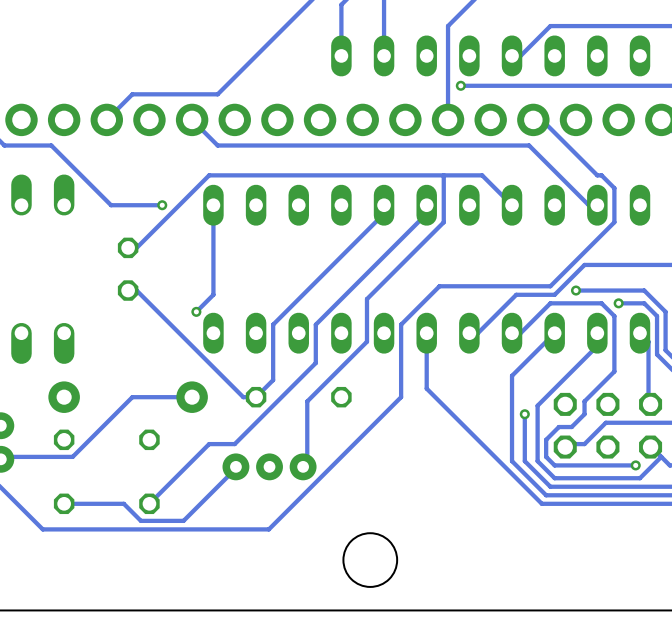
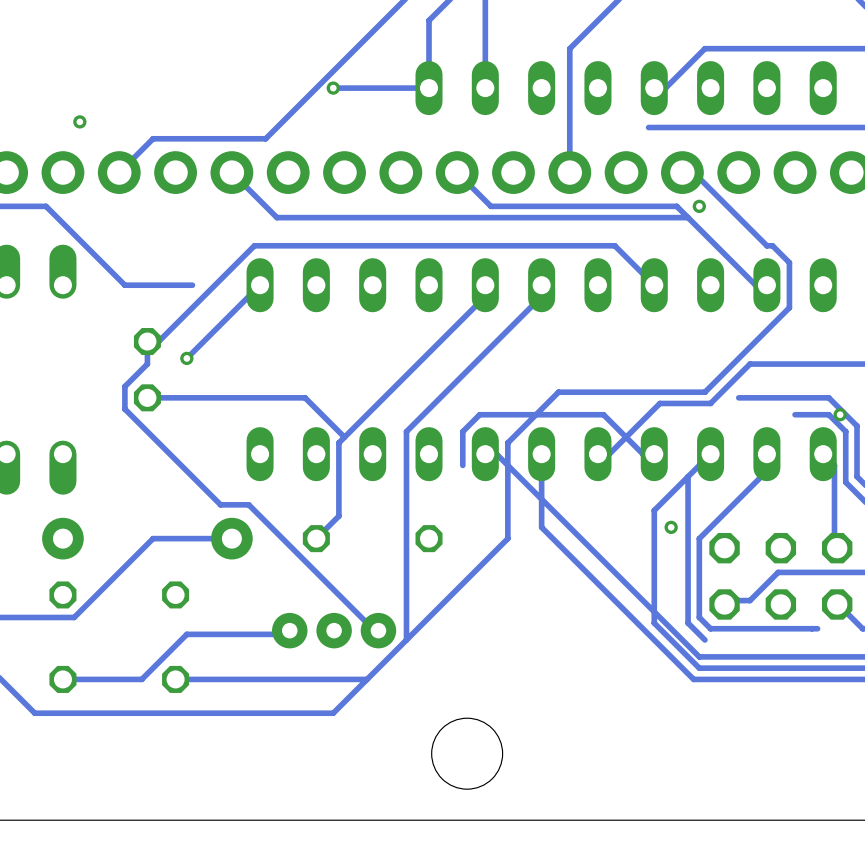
via: none -> (333, 88)
track: none -> (429, 88) (333, 88)
via: none -> (79, 121)
via: (460, 85) -> none
track: (507, 85) (460, 85) -> none
track: none -> (265, 206) (276, 217) (688, 217)
track: (388, 145) (217, 145) -> (490, 206) (457, 172)
via: none -> (699, 206)
track: (443, 175) (443, 222) (366, 299) (366, 316) -> (654, 454) (643, 454) (603, 414) (479, 414) (462, 431)
via: (162, 205) -> none
track: (213, 205) (213, 294) (196, 311) -> (260, 285) (186, 358)
via: none -> (186, 358)
track: (136, 290) (243, 397) (256, 397) -> (158, 397) (305, 397) (344, 437)
via: (576, 290) -> none
via position: (618, 303) -> (840, 414)
via: (196, 311) -> none
track: (324, 316) (315, 324) (315, 363) (234, 444) (209, 444) (149, 503) -> (406, 431) (406, 640)
track: (512, 333) (520, 333) (550, 303) (601, 303) (614, 316) (614, 371) (584, 401) (584, 414) (571, 427) (558, 427) (546, 439) -> none
track: (366, 341) (307, 401) (307, 465) (303, 466) -> (147, 341) (147, 364) (124, 386) (124, 409) (220, 504) (248, 504) (378, 634) (378, 630)
track: none -> (688, 476) (688, 549)
track: (546, 397) (537, 405) -> (699, 538) (699, 594)
track: (524, 414) (524, 461) (550, 486) -> (485, 454) (496, 454) (699, 656) (704, 656)
via position: (524, 414) -> (671, 527)
track: (661, 456) (639, 478) (554, 478) (550, 473) -> none
via: (635, 465) -> none
track: (234, 469) (183, 520) (140, 520) (123, 503) -> (288, 634) (186, 634) (141, 679)
track: none -> (367, 679) (175, 679)

